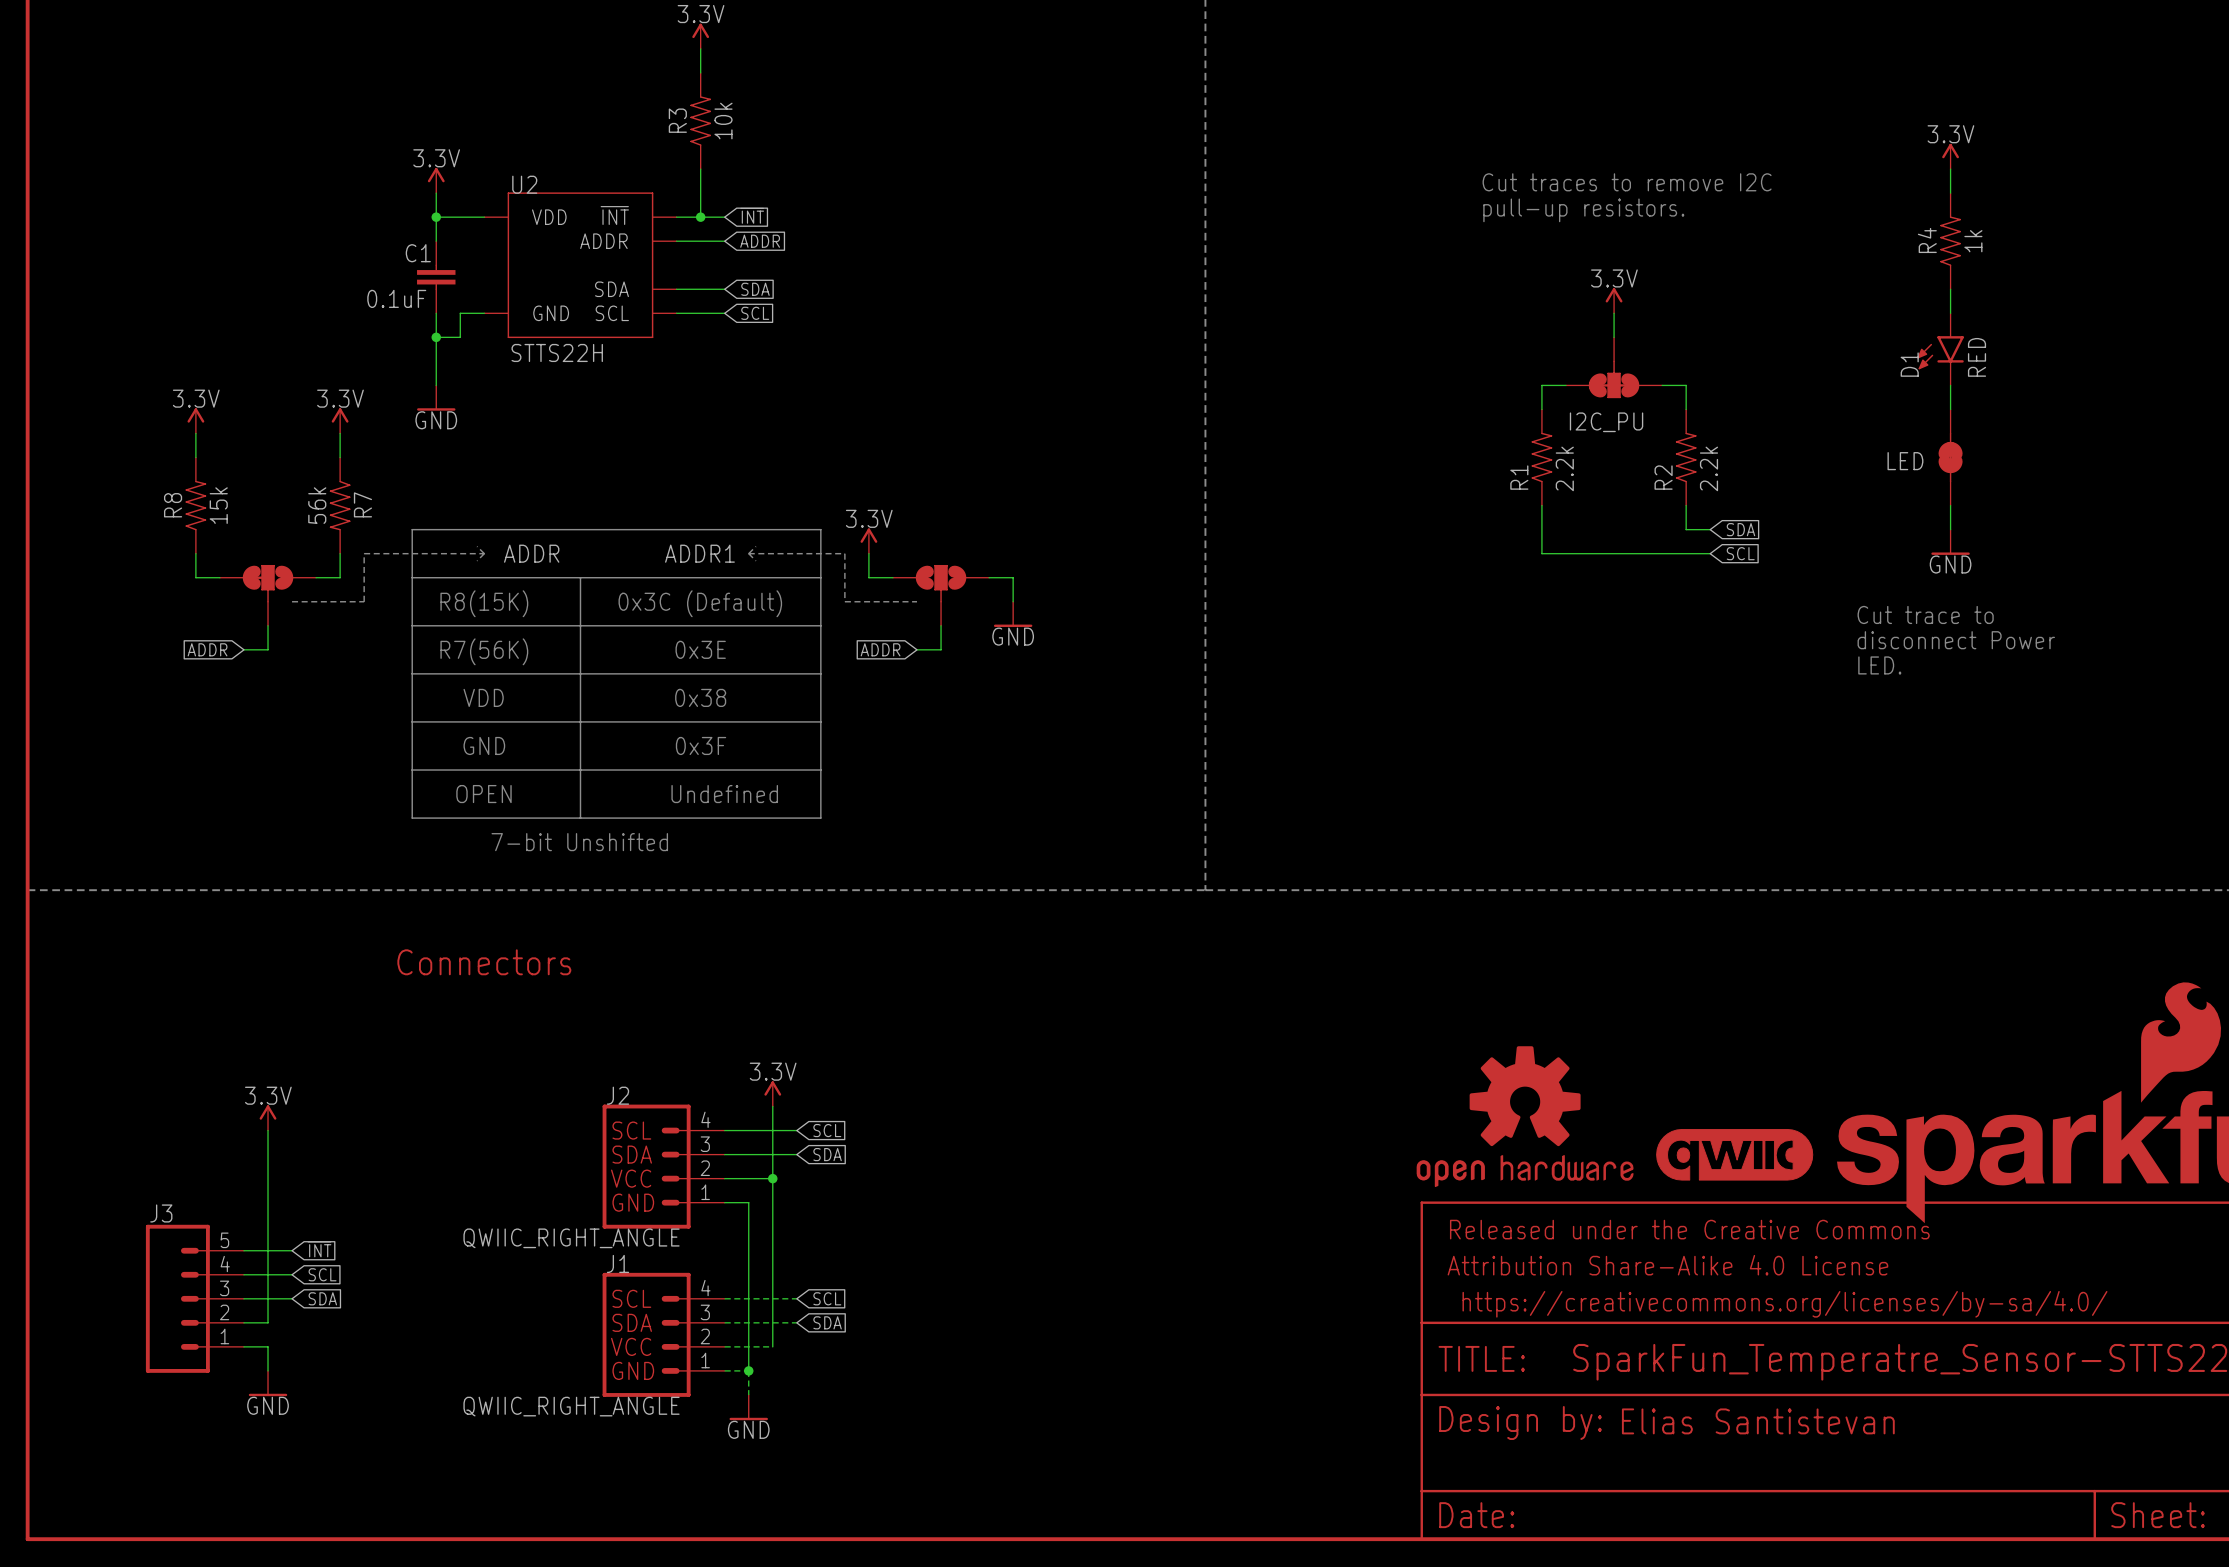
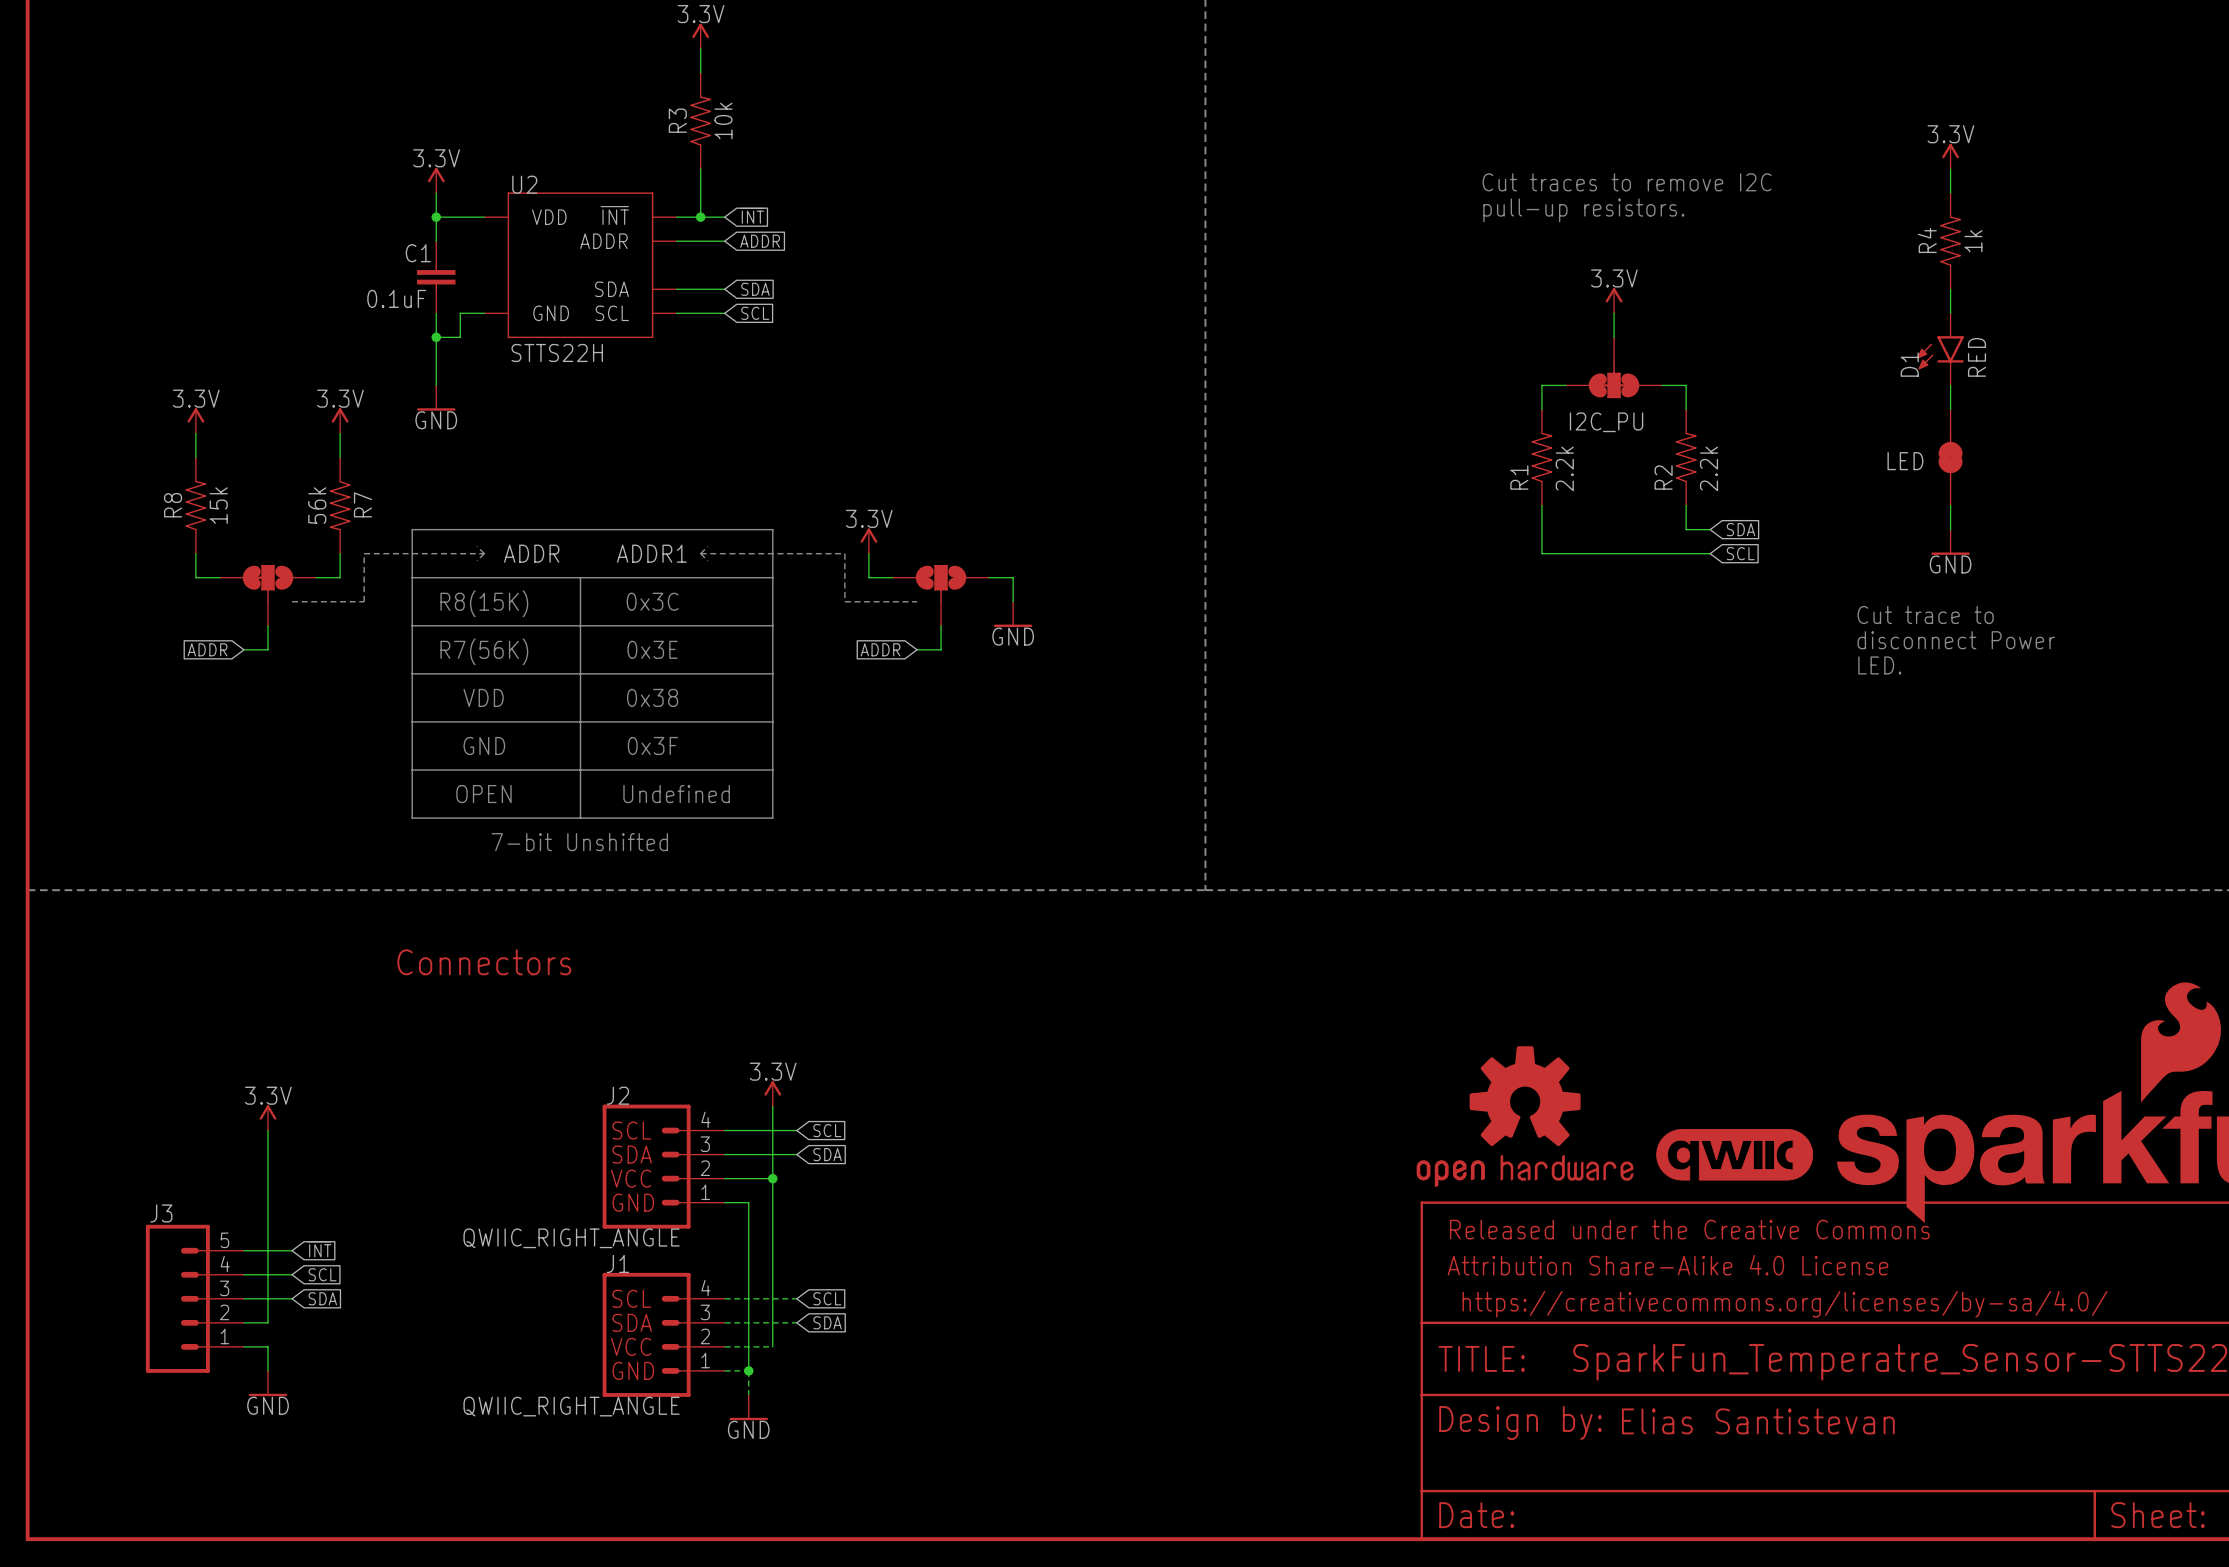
line: (772, 529) (820, 529) (820, 818) (772, 818) -> (772, 529) (772, 818)
line: none -> (707, 546) (700, 553)
line: (755, 546) (748, 553) (755, 560) -> none
ADDR1 name position: ADDR1 (699, 553) -> ADDR1 (651, 553)
line: none -> (700, 553) (707, 560)
line: (772, 577) (820, 577) -> (700, 553) (748, 553)
text: none -> 0x3C (652, 601)
text: 0x3C (Default) (700, 603) -> none
line: (772, 625) (820, 625) -> none
text position: 0x3E (700, 649) -> 0x3E (652, 649)
line: (772, 673) (820, 673) -> none
text position: 0x38 (700, 697) -> 0x38 (652, 697)
line: (772, 721) (820, 721) -> none
text position: 0x3F (701, 745) -> 0x3F (652, 745)
line: (772, 770) (820, 770) -> none
text position: Undefined (724, 794) -> Undefined (676, 794)

